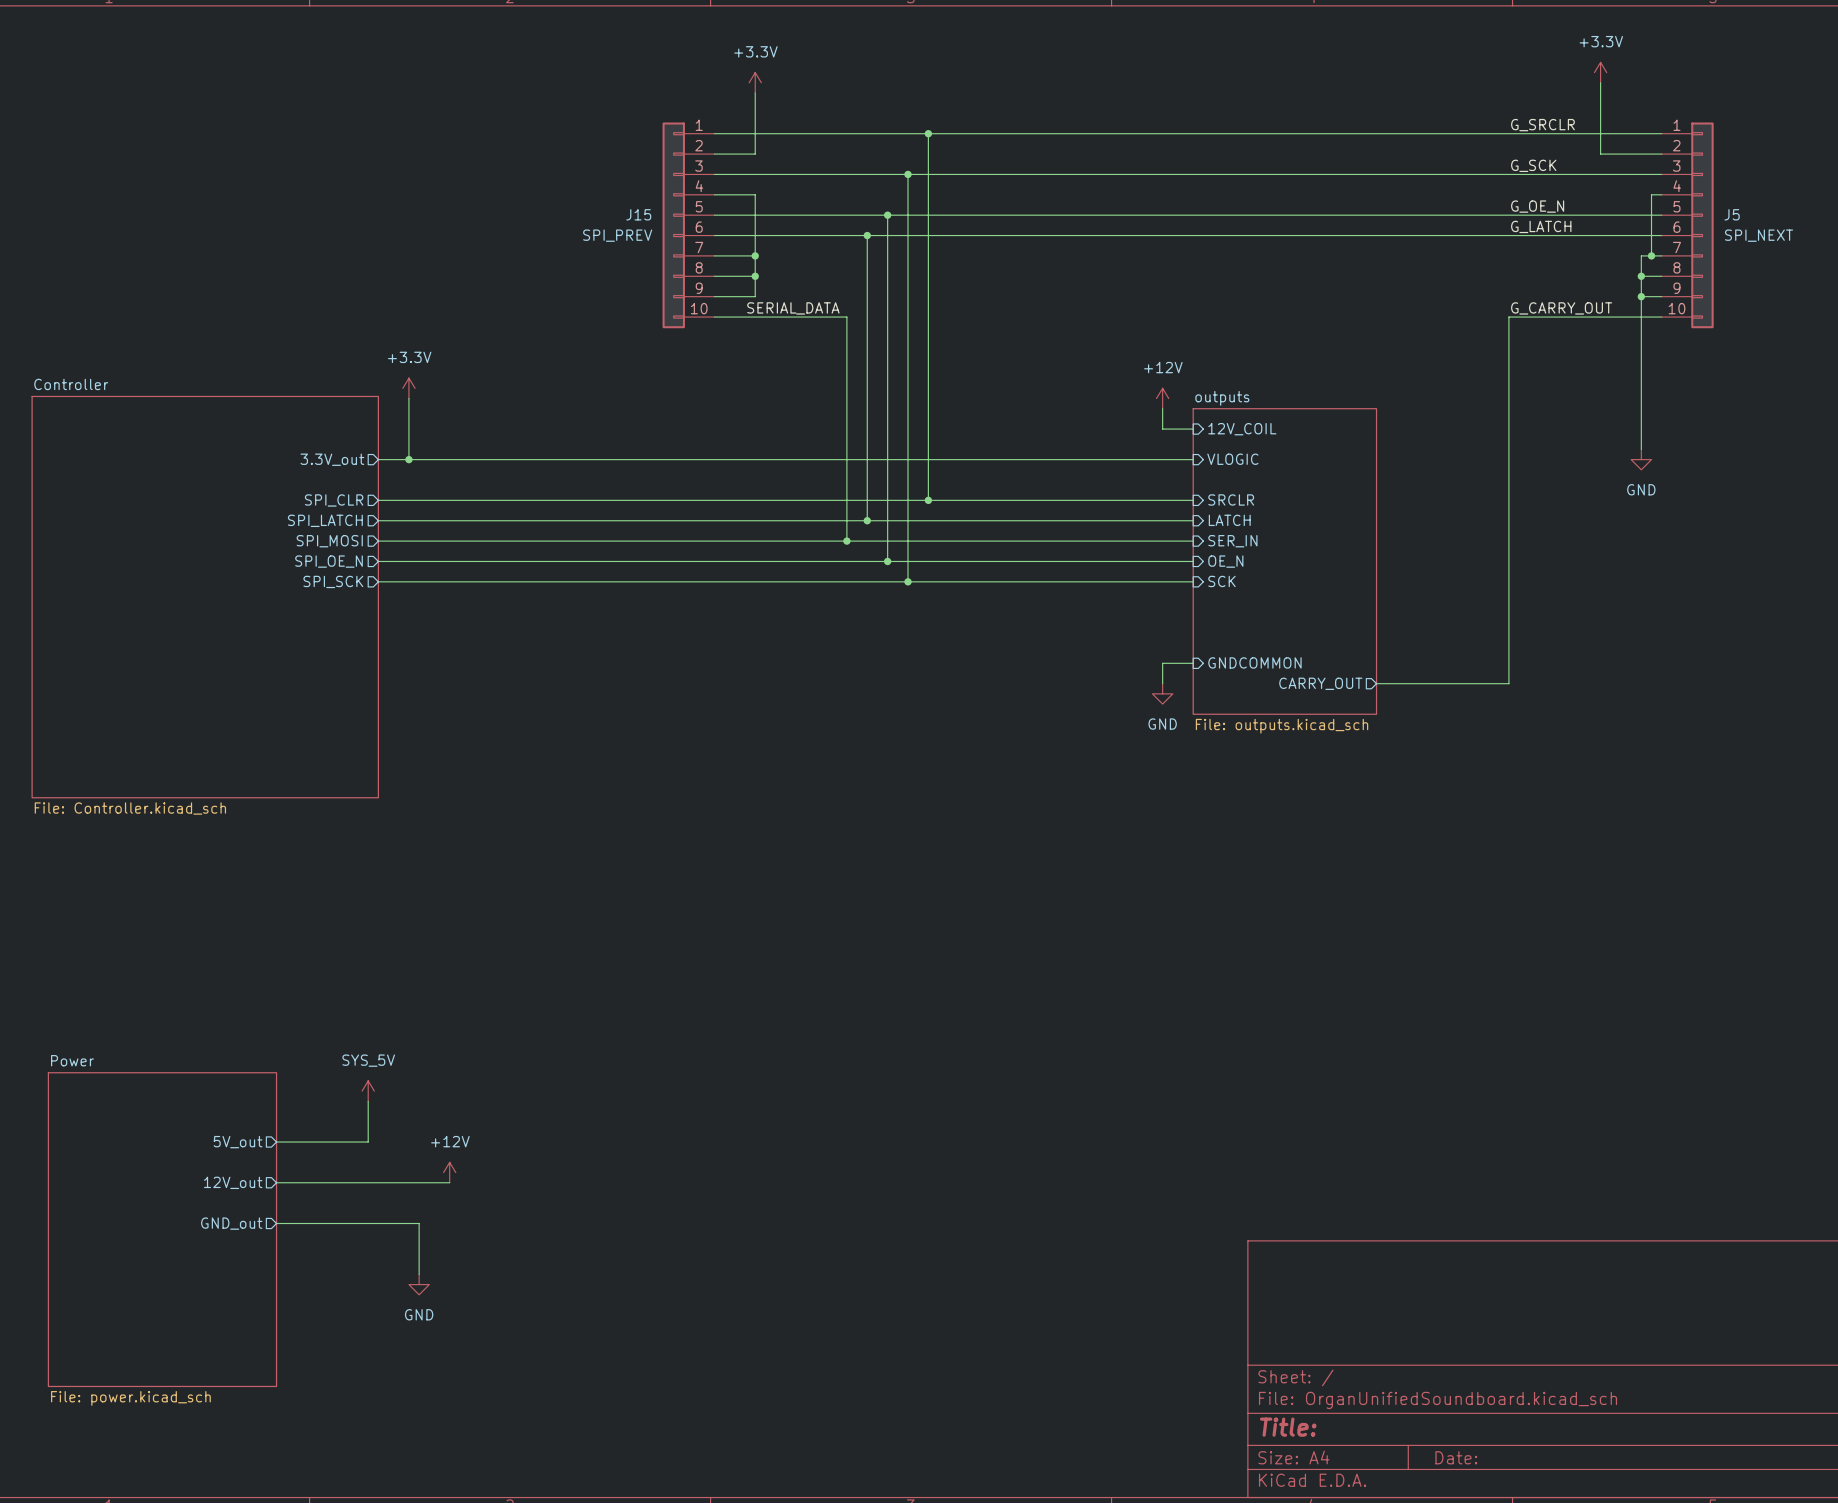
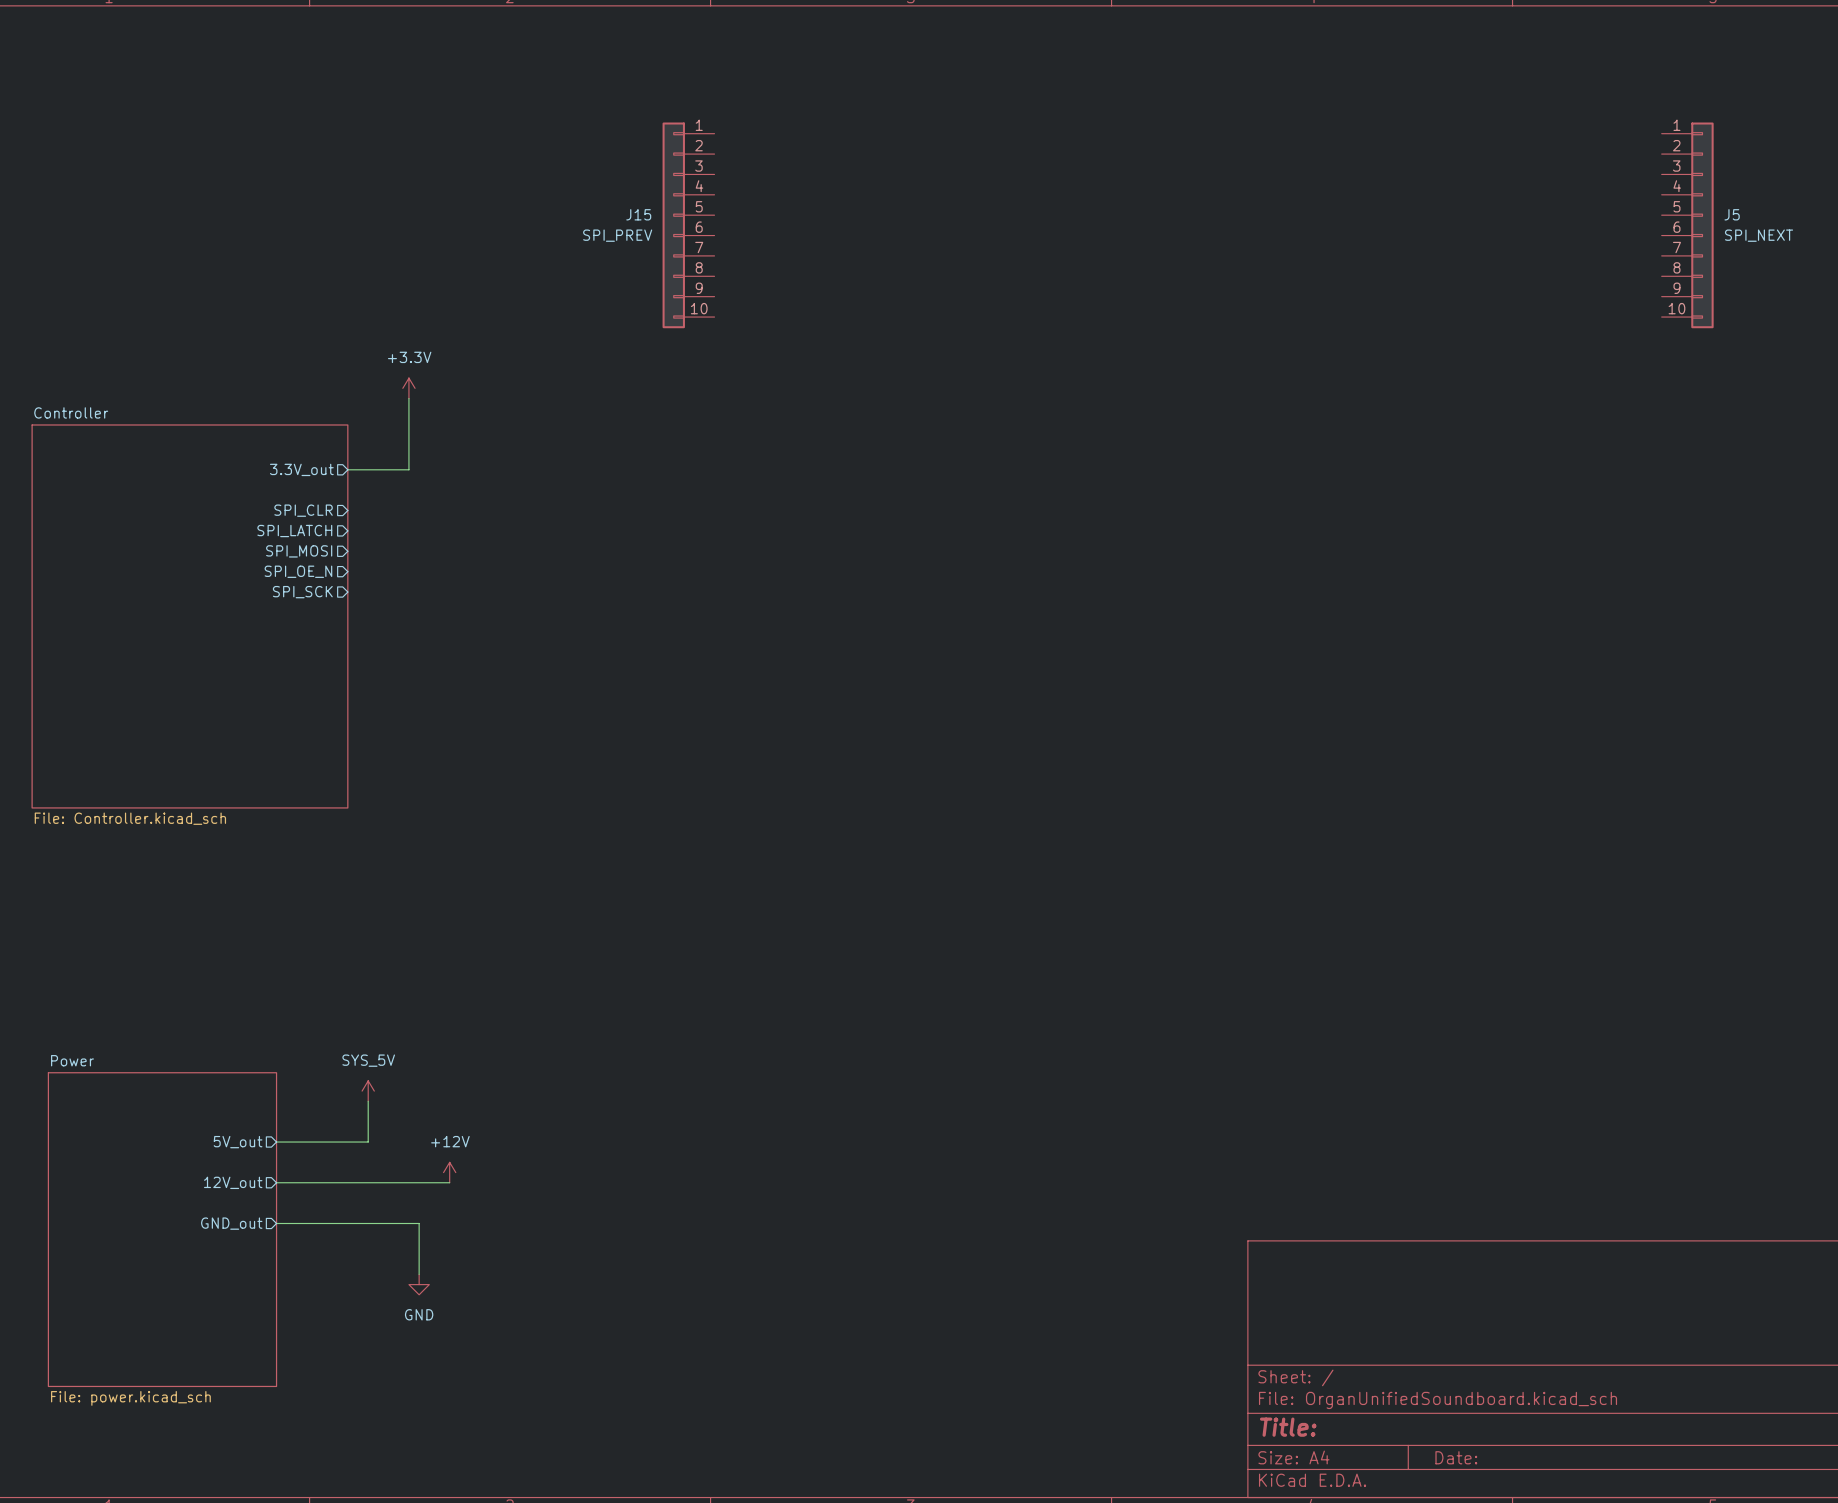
power symbol: +3.3V (1600, 72) -> none
power symbol: +3.3V (755, 82) -> none
wire: (1600, 82) (1600, 154) (1661, 154) -> none
wire: (755, 92) (755, 154) (714, 154) -> none
label: G_SRCLR (1542, 125) -> none
wire: (714, 133) (1661, 133) -> none
wire: (928, 133) (928, 500) -> none
junction: (928, 133) -> none
label: G_SCK (1533, 165) -> none
wire: (714, 174) (1661, 174) -> none
wire: (908, 174) (908, 581) -> none
junction: (908, 174) -> none
wire: (714, 194) (755, 194) (755, 296) (714, 296) -> none
wire: (1661, 194) (1651, 194) (1651, 255) -> none
label: G_OE_N (1537, 206) -> none
wire: (714, 215) (1661, 215) -> none
wire: (887, 215) (887, 561) -> none
junction: (887, 215) -> none
label: G_LATCH (1541, 226) -> none
wire: (714, 235) (1661, 235) -> none
wire: (867, 235) (867, 520) -> none
junction: (867, 235) -> none
wire: (714, 255) (755, 255) -> none
junction: (755, 255) -> none
junction: (1651, 255) -> none
wire: (1661, 255) (1641, 255) (1641, 449) -> none
wire: (714, 276) (755, 276) -> none
junction: (755, 276) -> none
wire: (1641, 276) (1661, 276) -> none
junction: (1641, 276) -> none
wire: (1641, 296) (1661, 296) -> none
junction: (1641, 296) -> none
label: SERIAL_DATA (793, 308) -> none
label: G_CARRY_OUT (1561, 308) -> none
wire: (714, 317) (846, 317) (846, 541) -> none
wire: (1661, 317) (1508, 317) (1508, 683) (1376, 683) -> none
power symbol: +12V (1162, 398) -> none
wire: (1162, 408) (1162, 429) (1193, 429) -> none
sheet pin: 12V_COIL (1242, 429) -> none
sheet pin position: 3.3V_out (332, 459) -> 3.3V_out (301, 469)
wire: (378, 459) (1193, 459) -> none
wire: none -> (408, 459) (408, 469) (347, 469)
junction: (408, 459) -> none
sheet pin: VLOGIC (1232, 459) -> none
power symbol: GND (1641, 459) -> none
sheet pin: SRCLR (1231, 499) -> none
sheet pin position: SPI_CLR (334, 500) -> SPI_CLR (303, 510)
wire: (378, 500) (1193, 500) -> none
junction: (928, 500) -> none
sheet pin position: SPI_LATCH (325, 520) -> SPI_LATCH (294, 531)
wire: (378, 520) (1193, 520) -> none
junction: (867, 520) -> none
sheet pin: LATCH (1229, 520) -> none
sheet pin position: SPI_MOSI (329, 541) -> SPI_MOSI (299, 551)
wire: (378, 541) (1193, 541) -> none
junction: (846, 541) -> none
sheet pin: SER_IN (1232, 541) -> none
sheet pin position: SPI_OE_N (329, 561) -> SPI_OE_N (298, 571)
wire: (378, 561) (1193, 561) -> none
junction: (887, 561) -> none
sheet pin: OE_N (1225, 561) -> none
sheet outputs: File: outputs.kicad_sch (1284, 561) -> none
sheet pin position: SPI_SCK (333, 581) -> SPI_SCK (302, 592)
wire: (378, 581) (1193, 581) -> none
junction: (908, 581) -> none
sheet pin: SCK (1221, 581) -> none
sheet Controller: File: Controller.kicad_sch (205, 597) -> none
sheet Controller: none -> File: Controller.kicad_sch (189, 616)
sheet pin: GNDCOMMON (1254, 662) -> none
wire: (1193, 663) (1162, 663) (1162, 683) -> none
sheet pin: CARRY_OUT (1320, 683) -> none
power symbol: GND (1162, 693) -> none

